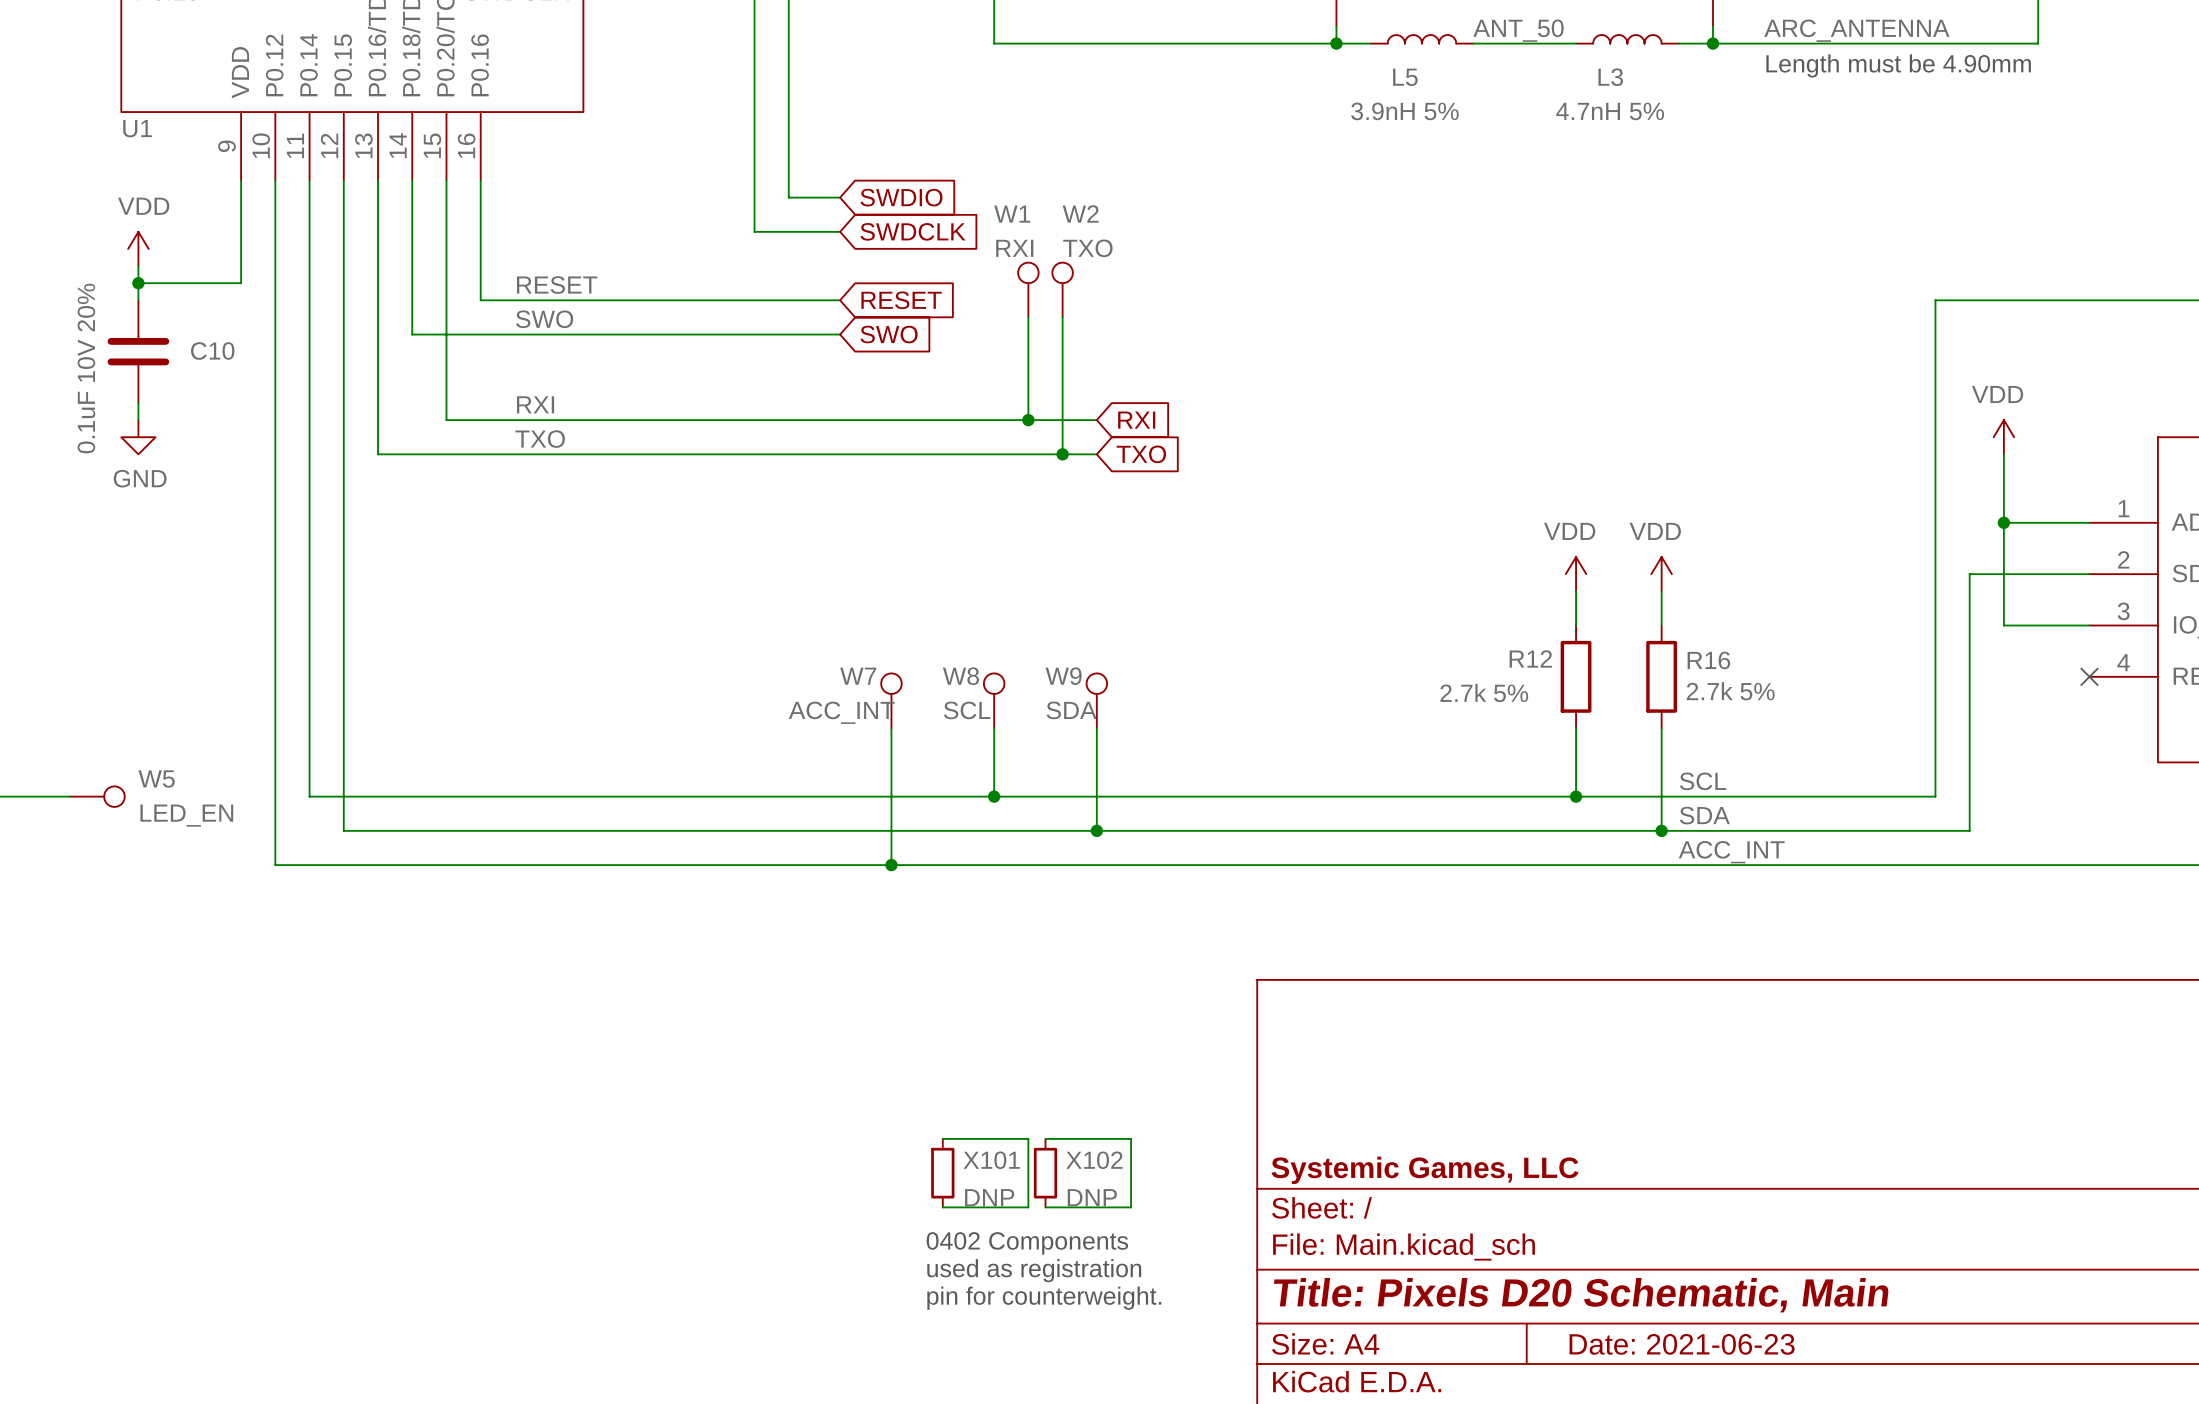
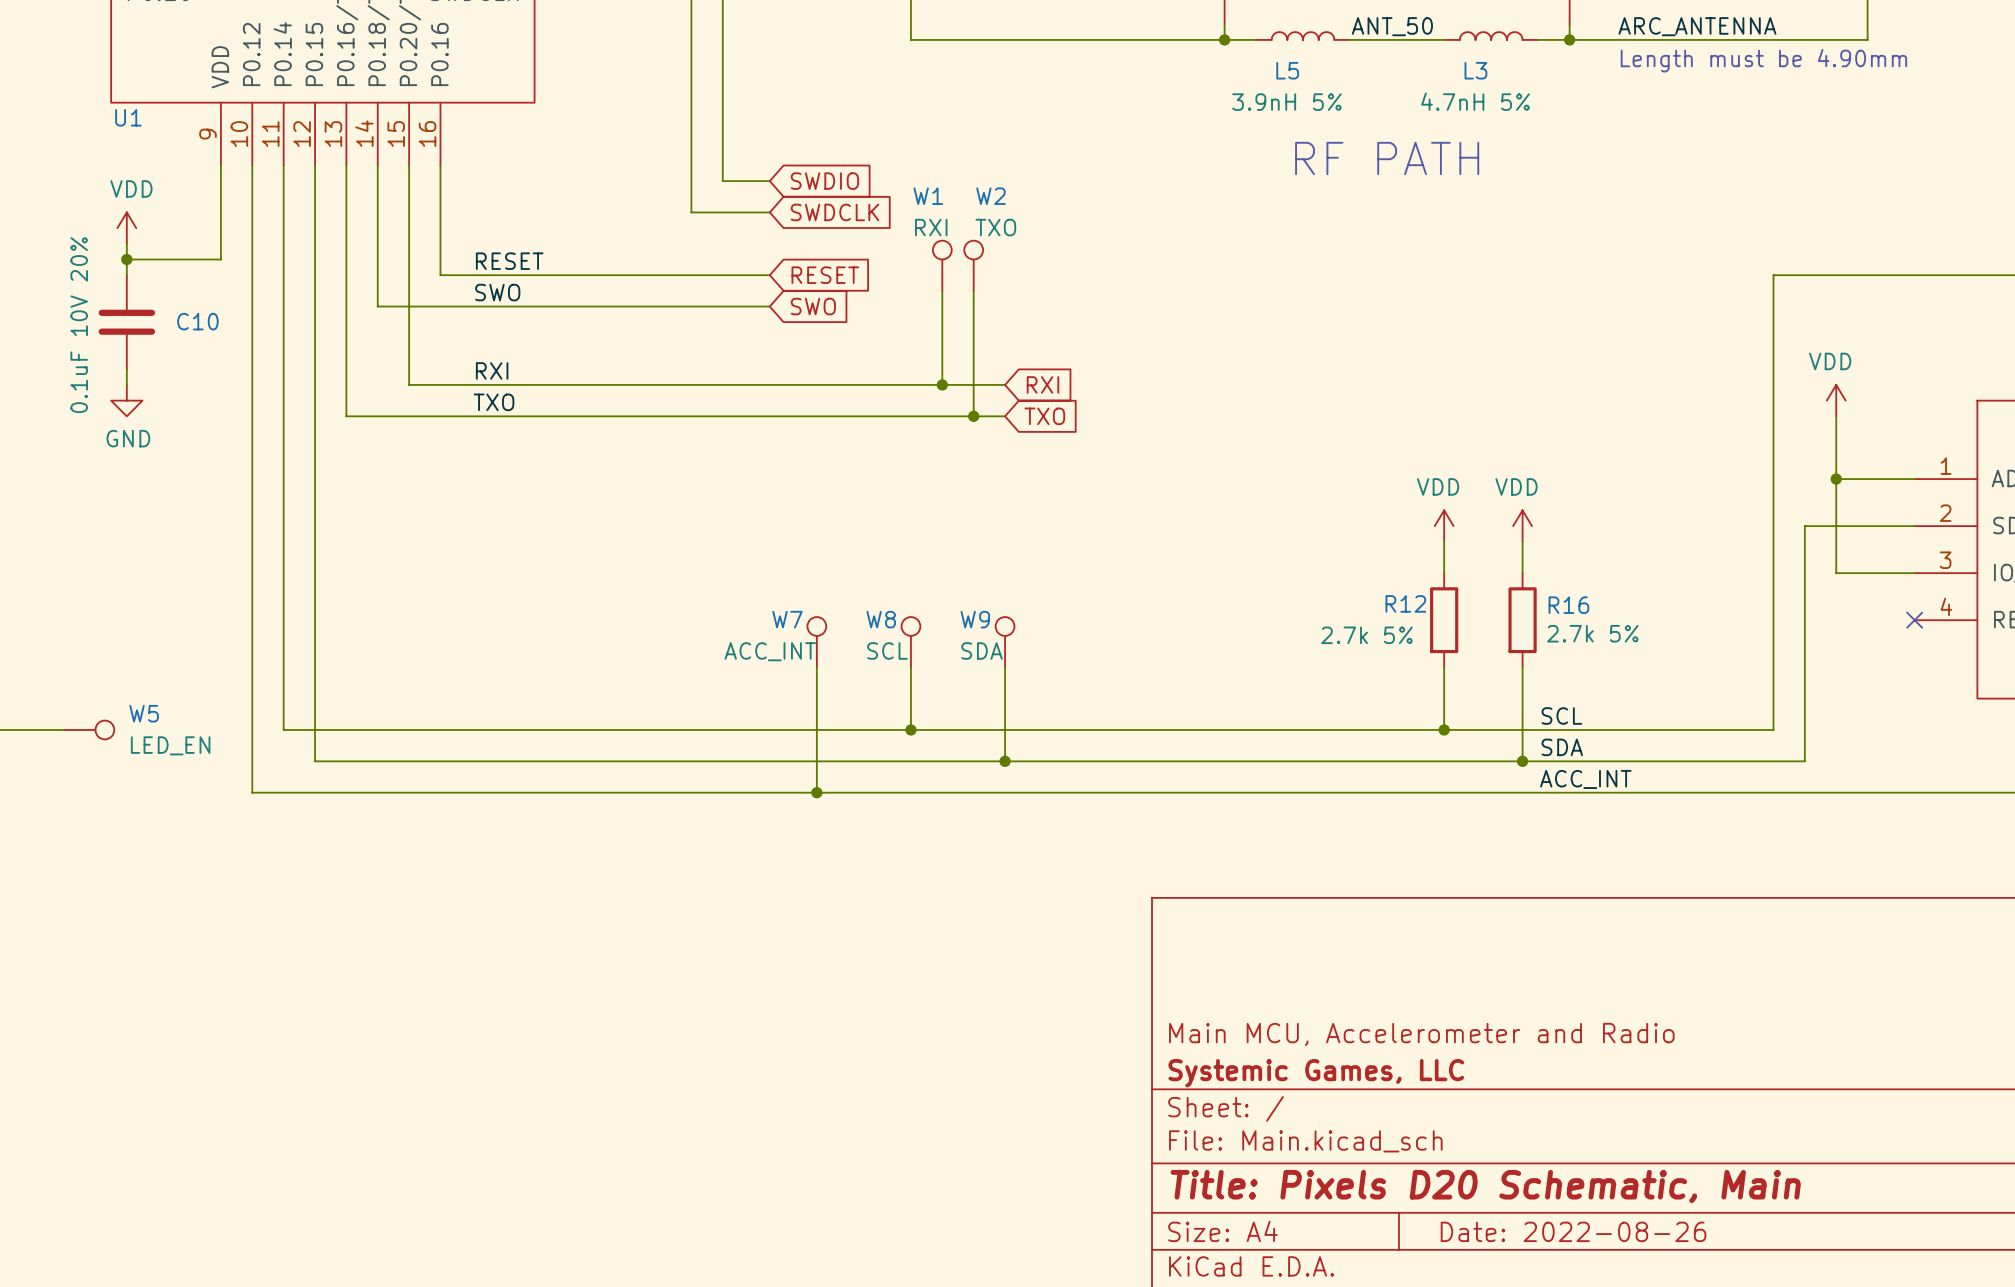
text: none -> RF PATH (1387, 158)
title block: none -> Main MCU, Accelerometer and Radio (1421, 1034)
wire: (942, 1138) (1028, 1138) (1028, 1207) (942, 1207) -> none
wire: (1045, 1138) (1131, 1138) (1131, 1207) (1045, 1207) -> none
X101: DNP (942, 1173) -> none
X102: DNP (1045, 1173) -> none
text: 0402 Components (1027, 1243) -> none
text: used as registration (1034, 1270) -> none
text: pin for counterweight. (1044, 1298) -> none
title block: Date: 2021-06-23 (1682, 1344) -> Date: 2022-08-26 (1573, 1231)

